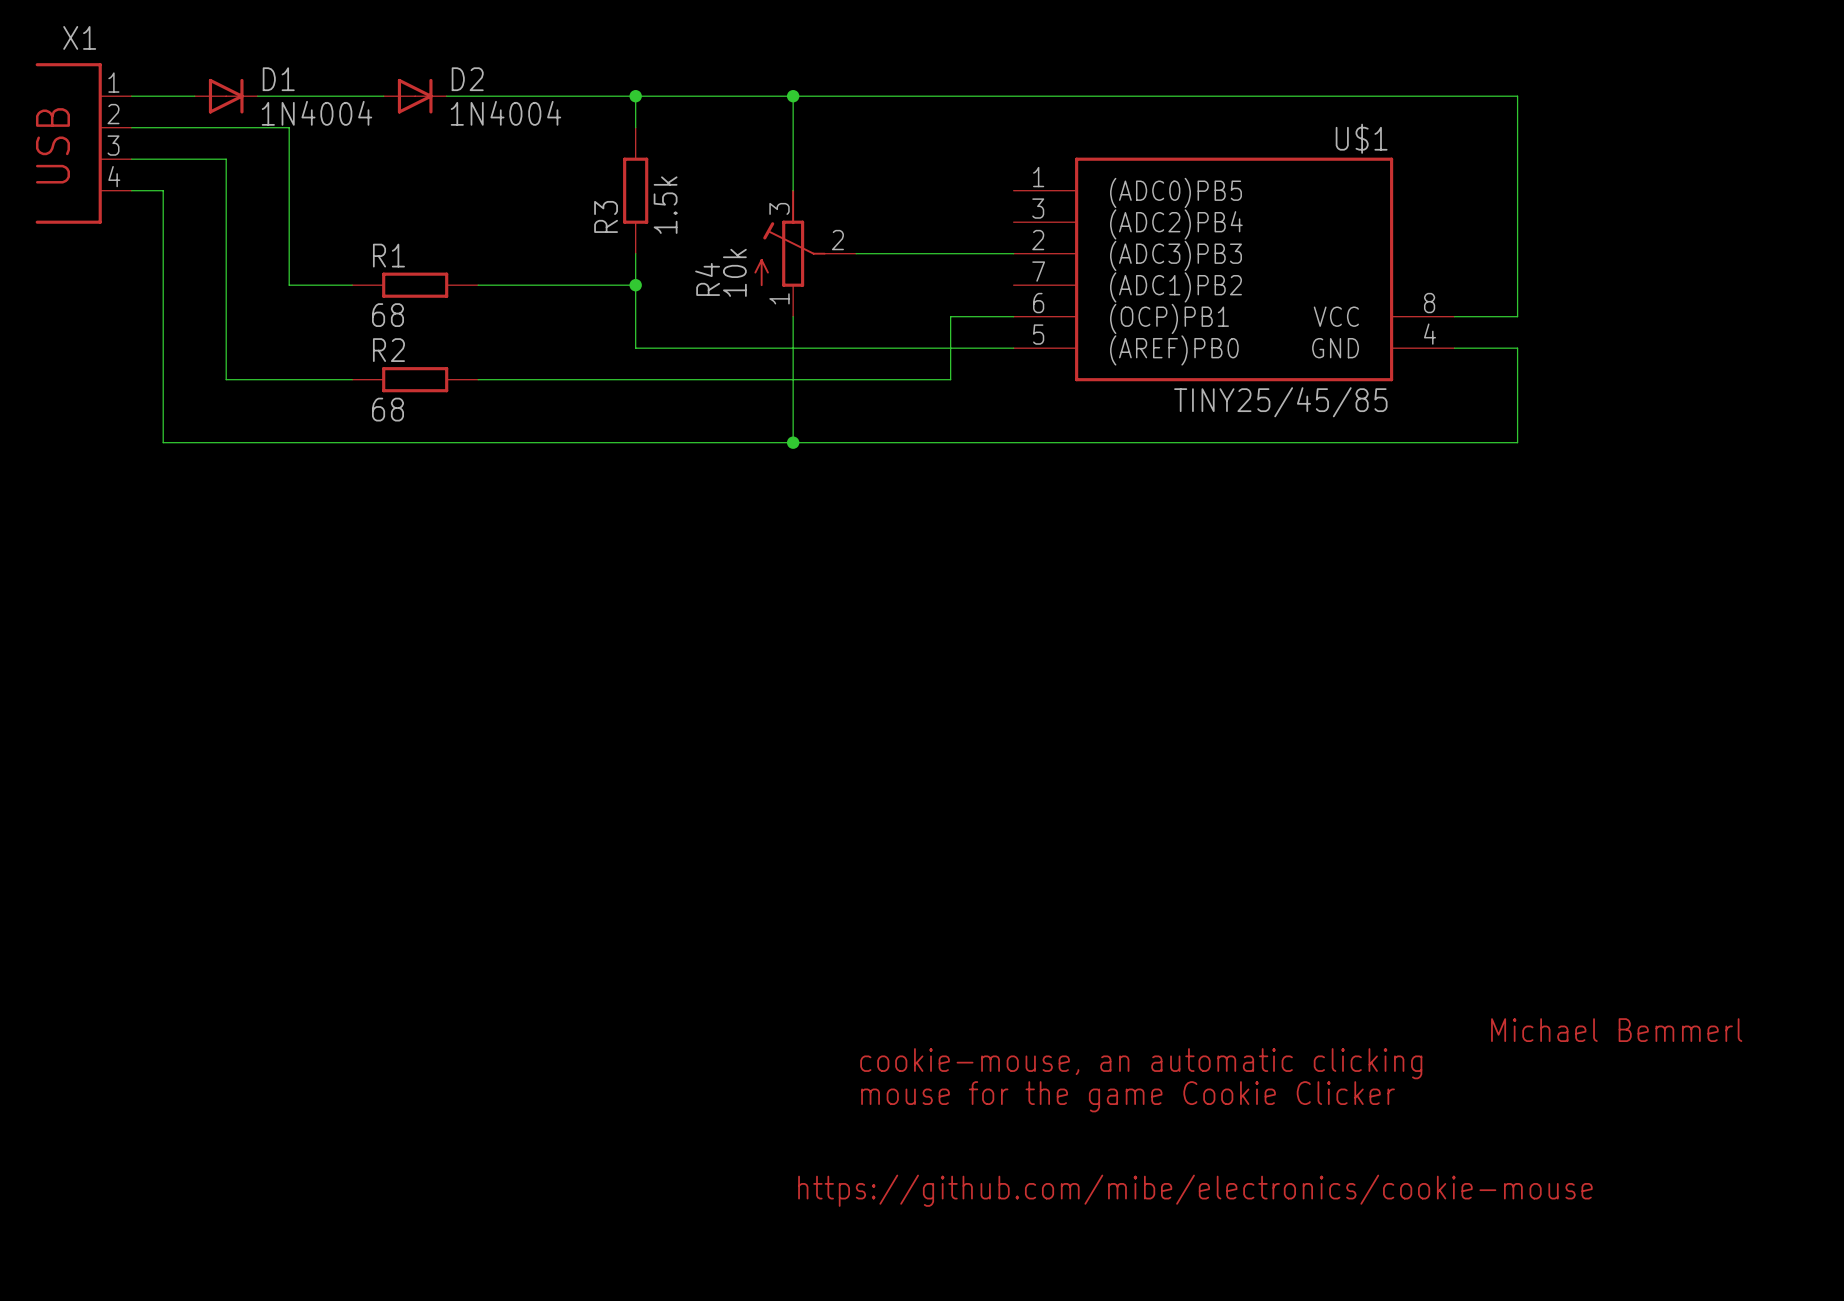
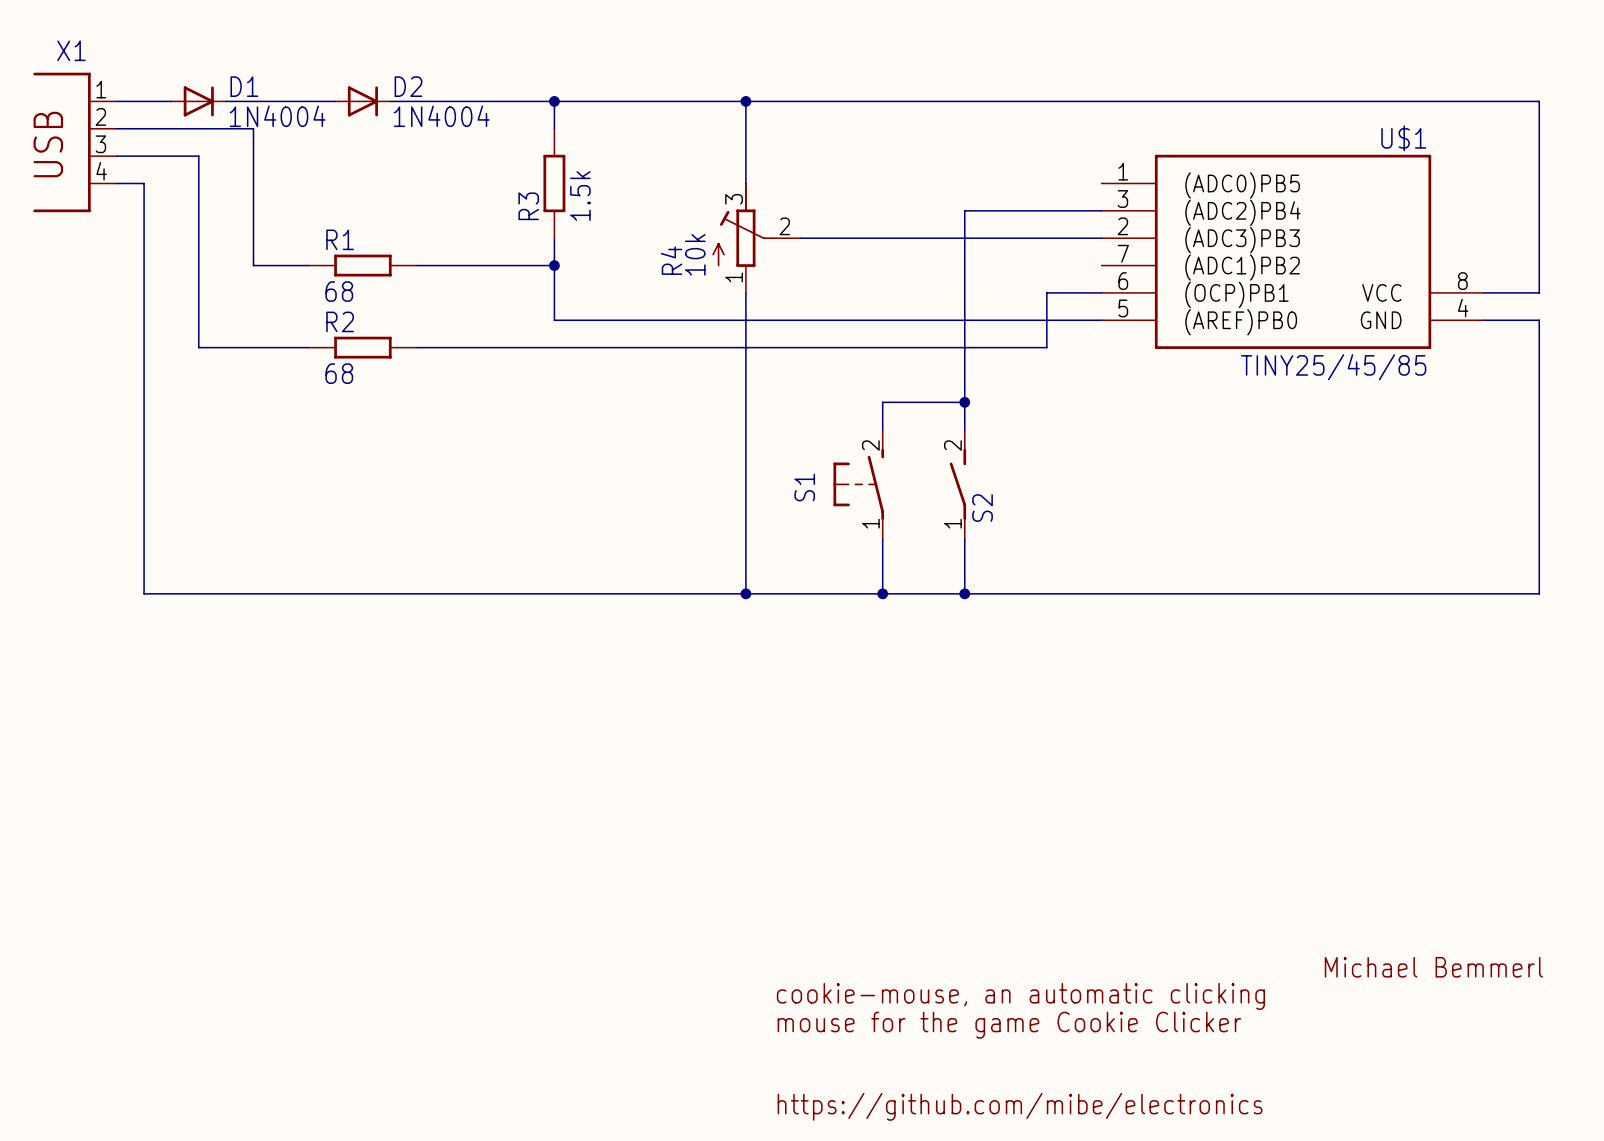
wire: (793, 96) (793, 190) -> (745, 101) (745, 183)
junction position: (793, 96) -> (745, 101)
wire: (1517, 96) (1517, 316) (1454, 316) -> (1320, 101) (1539, 101) (1539, 292) (1484, 292)
wire: none -> (1101, 210) (964, 210) (964, 429)
R4 position: (805, 253) -> (756, 237)
wire: none -> (882, 238) (1101, 238)
U$1 position: (1234, 269) -> (1293, 251)
wire: (793, 316) (793, 442) -> none
wire: none -> (745, 292) (745, 593)
wire: (1013, 316) (950, 316) (950, 379) -> (1101, 292) (1046, 292) (1046, 347) (827, 347)
wire: none -> (882, 320) (1101, 320)
wire: (1454, 348) (1517, 348) (1517, 442) (1108, 442) -> none
wire: (163, 442) (1013, 442) -> (144, 402) (144, 593) (1539, 593) (1539, 320) (1484, 320)
junction: (793, 442) -> none
wire: none -> (882, 402) (882, 429)
junction: none -> (964, 402)
S1: none -> (858, 484)
S2: none -> (957, 484)
wire: none -> (882, 539) (882, 593)
wire: none -> (964, 539) (964, 593)
junction: none -> (745, 593)
junction: none -> (882, 593)
junction: none -> (964, 593)
text position: Michael Bemmerl (1616, 1030) -> Michael Bemmerl (1433, 967)
text position: cookie-mouse, an automatic clicking (1141, 1063) -> cookie-mouse, an automatic clicking (1020, 996)
text position: mouse for the game Cookie Clicker (1128, 1096) -> mouse for the game Cookie Clicker (1009, 1025)
text: https://github.com/mibe/electronics/cookie-mouse (1195, 1190) -> none
text: none -> https://github.com/mibe/electronics (1020, 1106)

